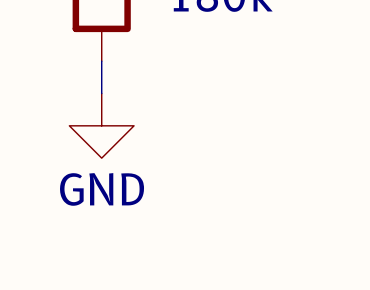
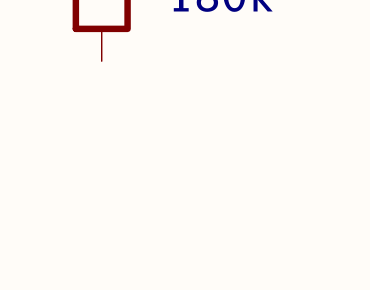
wire: (101, 61) (101, 93) -> none
power symbol: GND (101, 125) -> none

